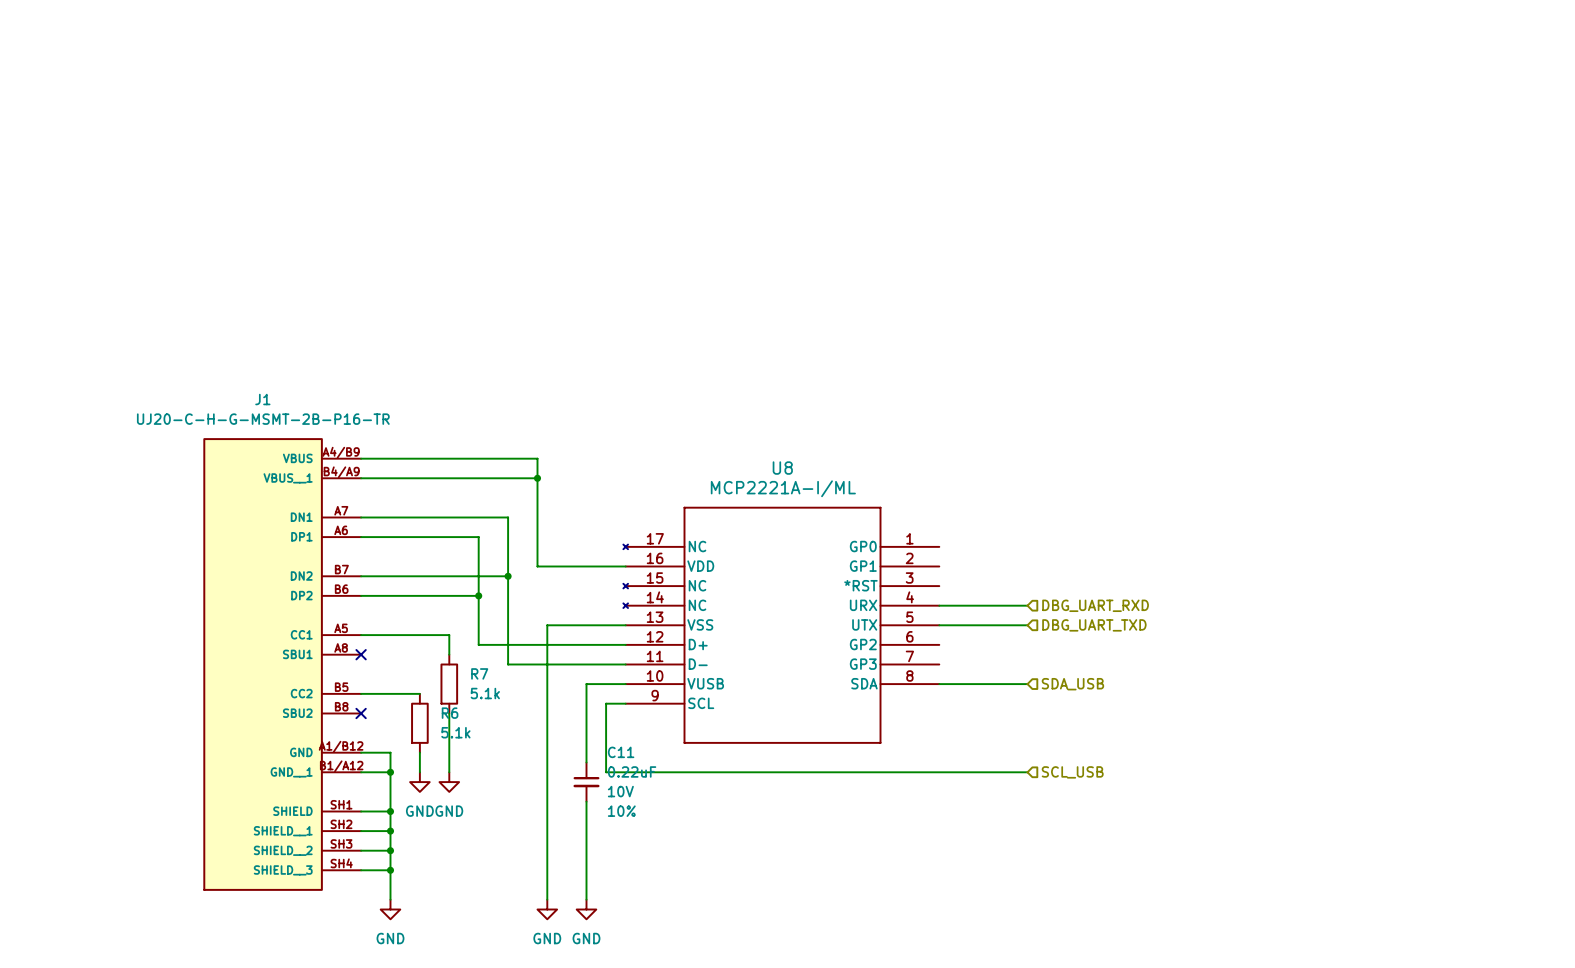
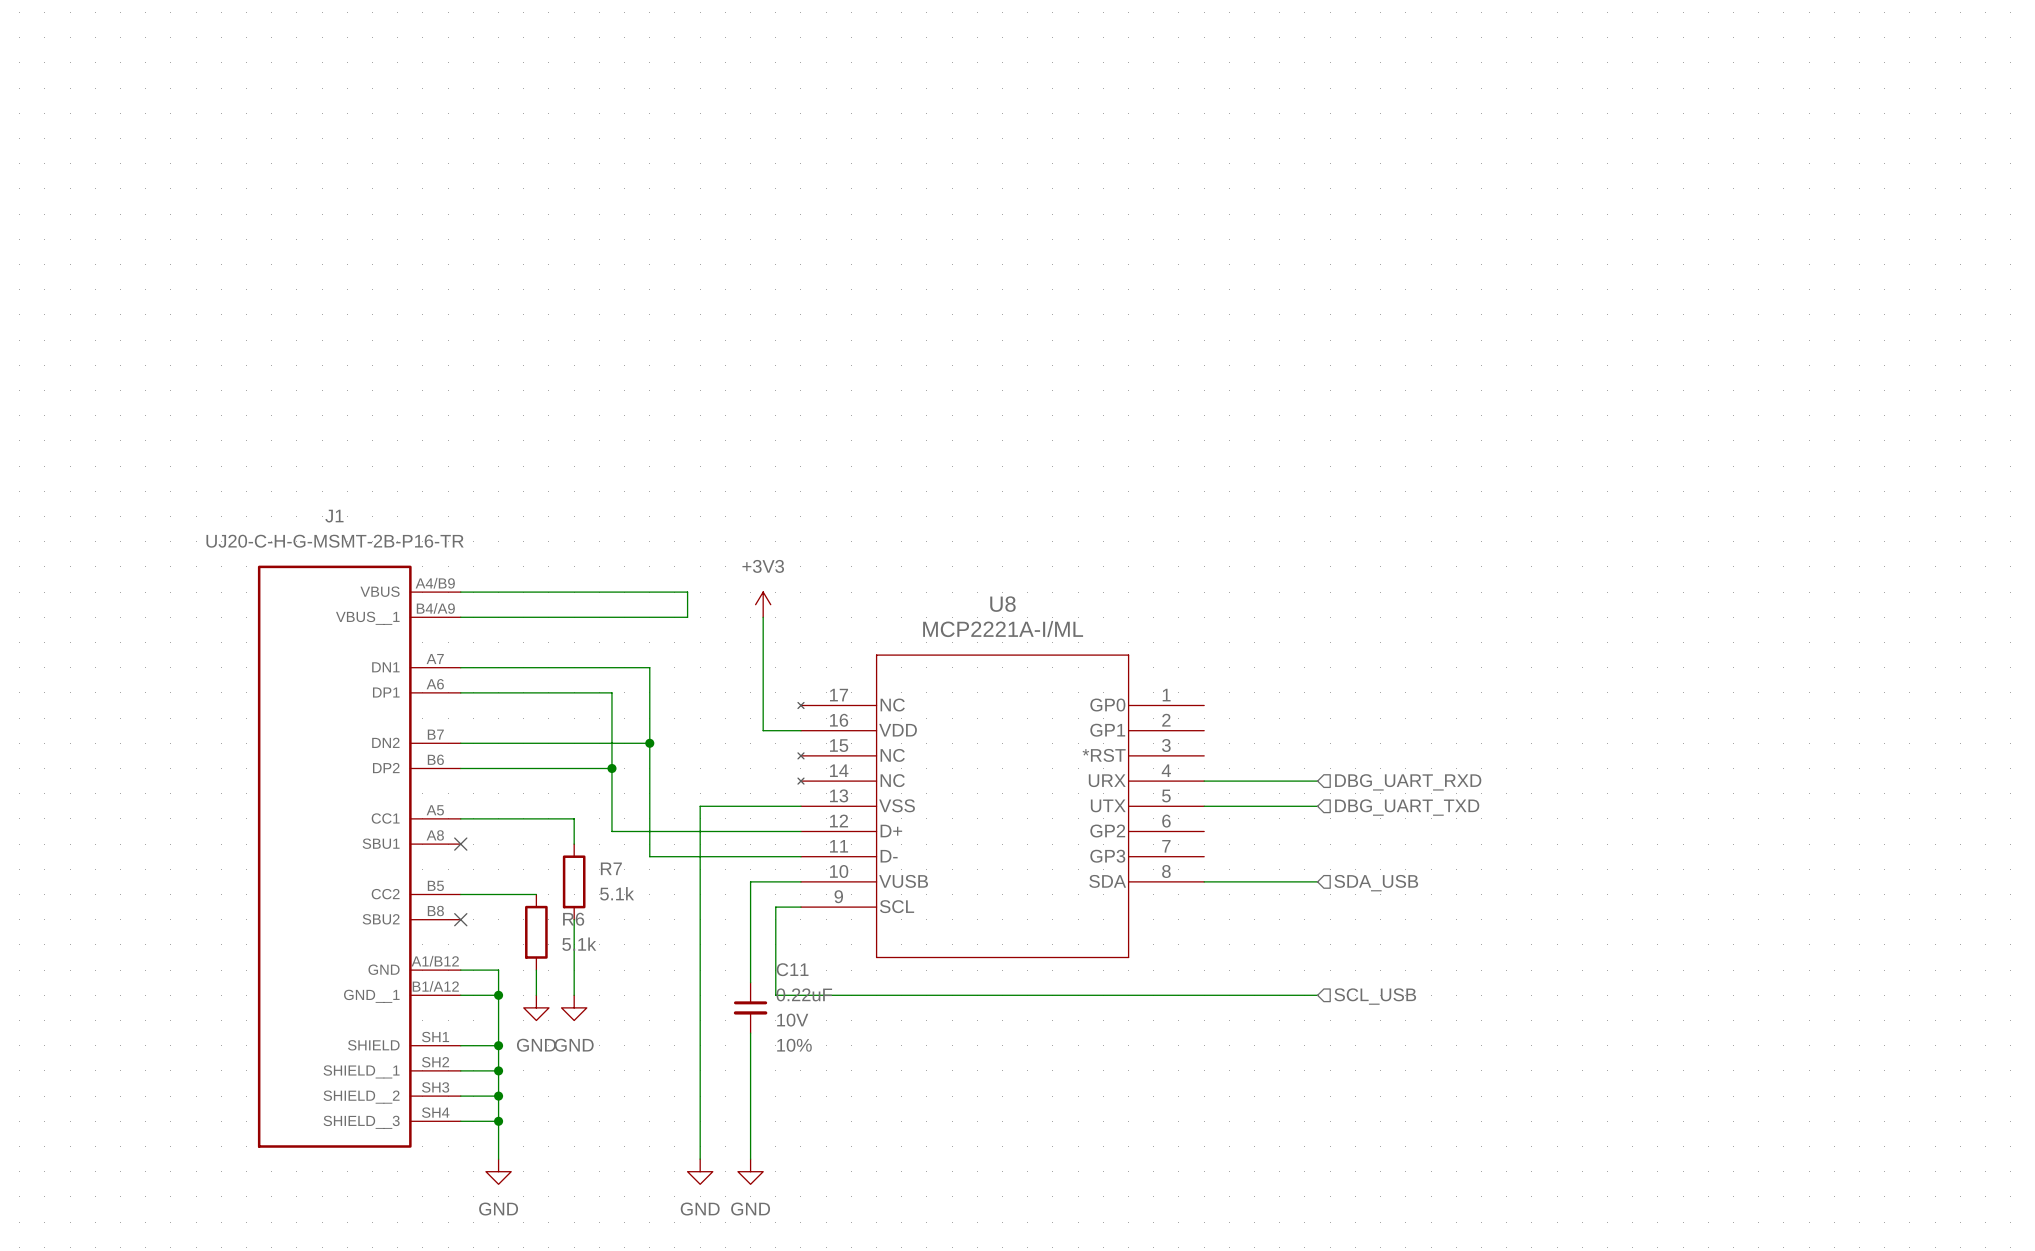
power symbol: none -> +3V3 (763, 604)
wire: (537, 478) (537, 566) (596, 566) -> (763, 617) (763, 730)
junction: (537, 478) -> none

